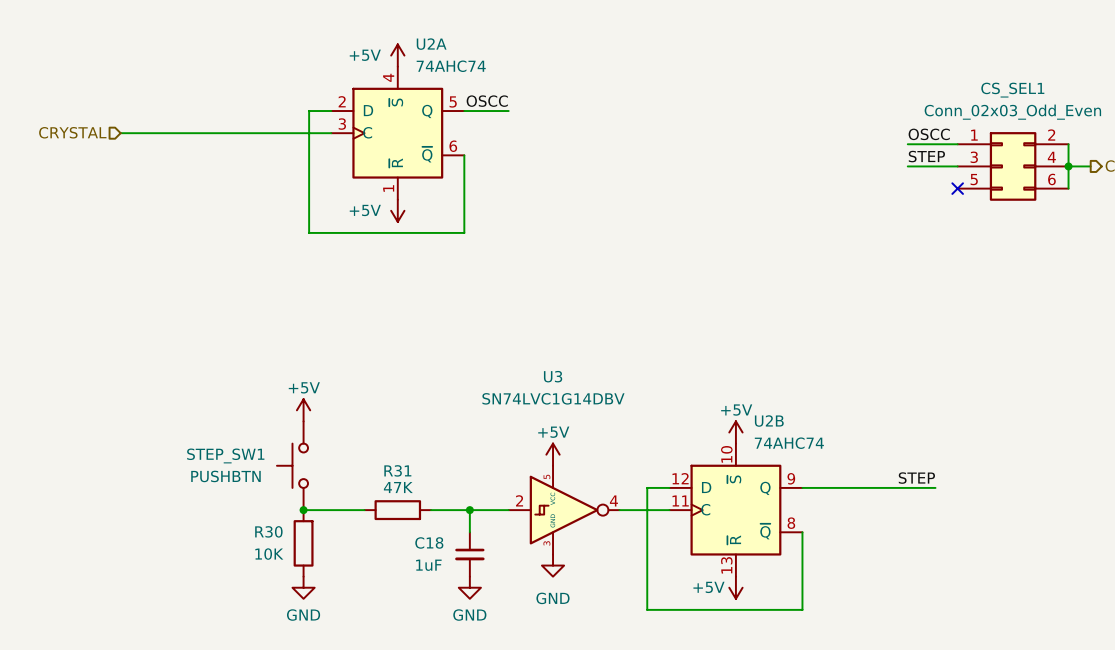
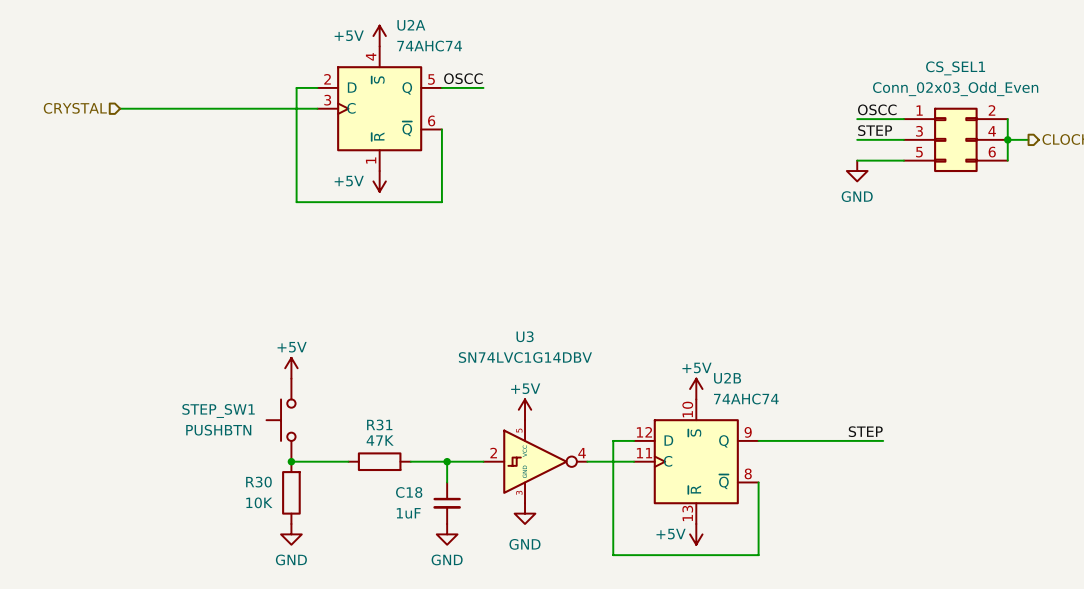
wire: none -> (857, 160) (903, 160)
no-connect mark: (957, 188) -> none
power symbol: none -> GND (857, 171)

